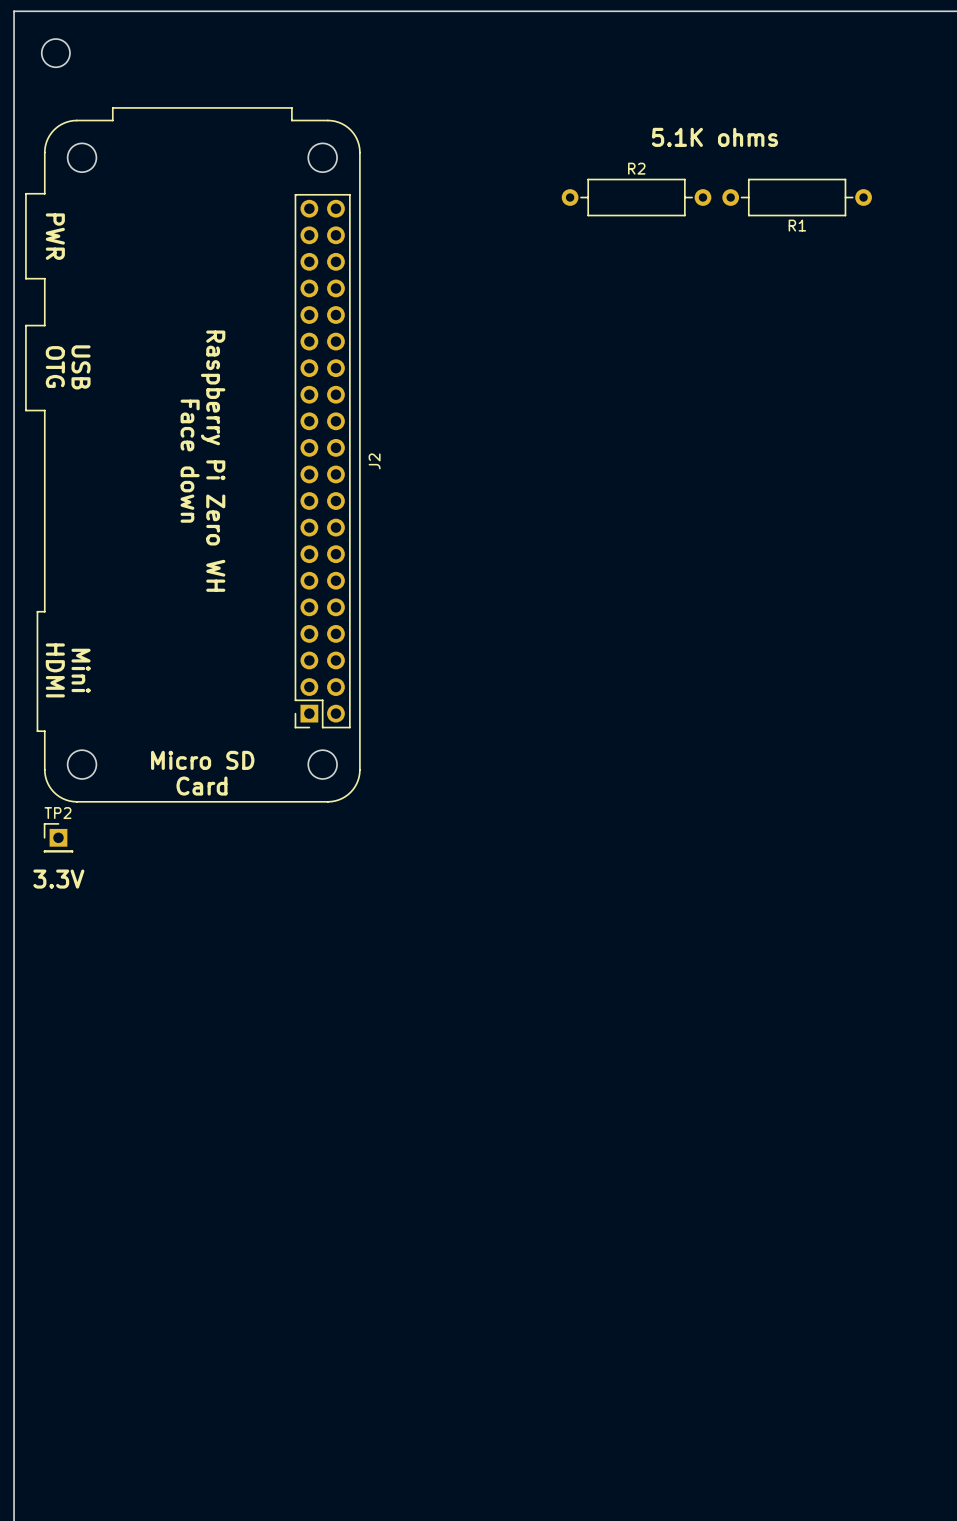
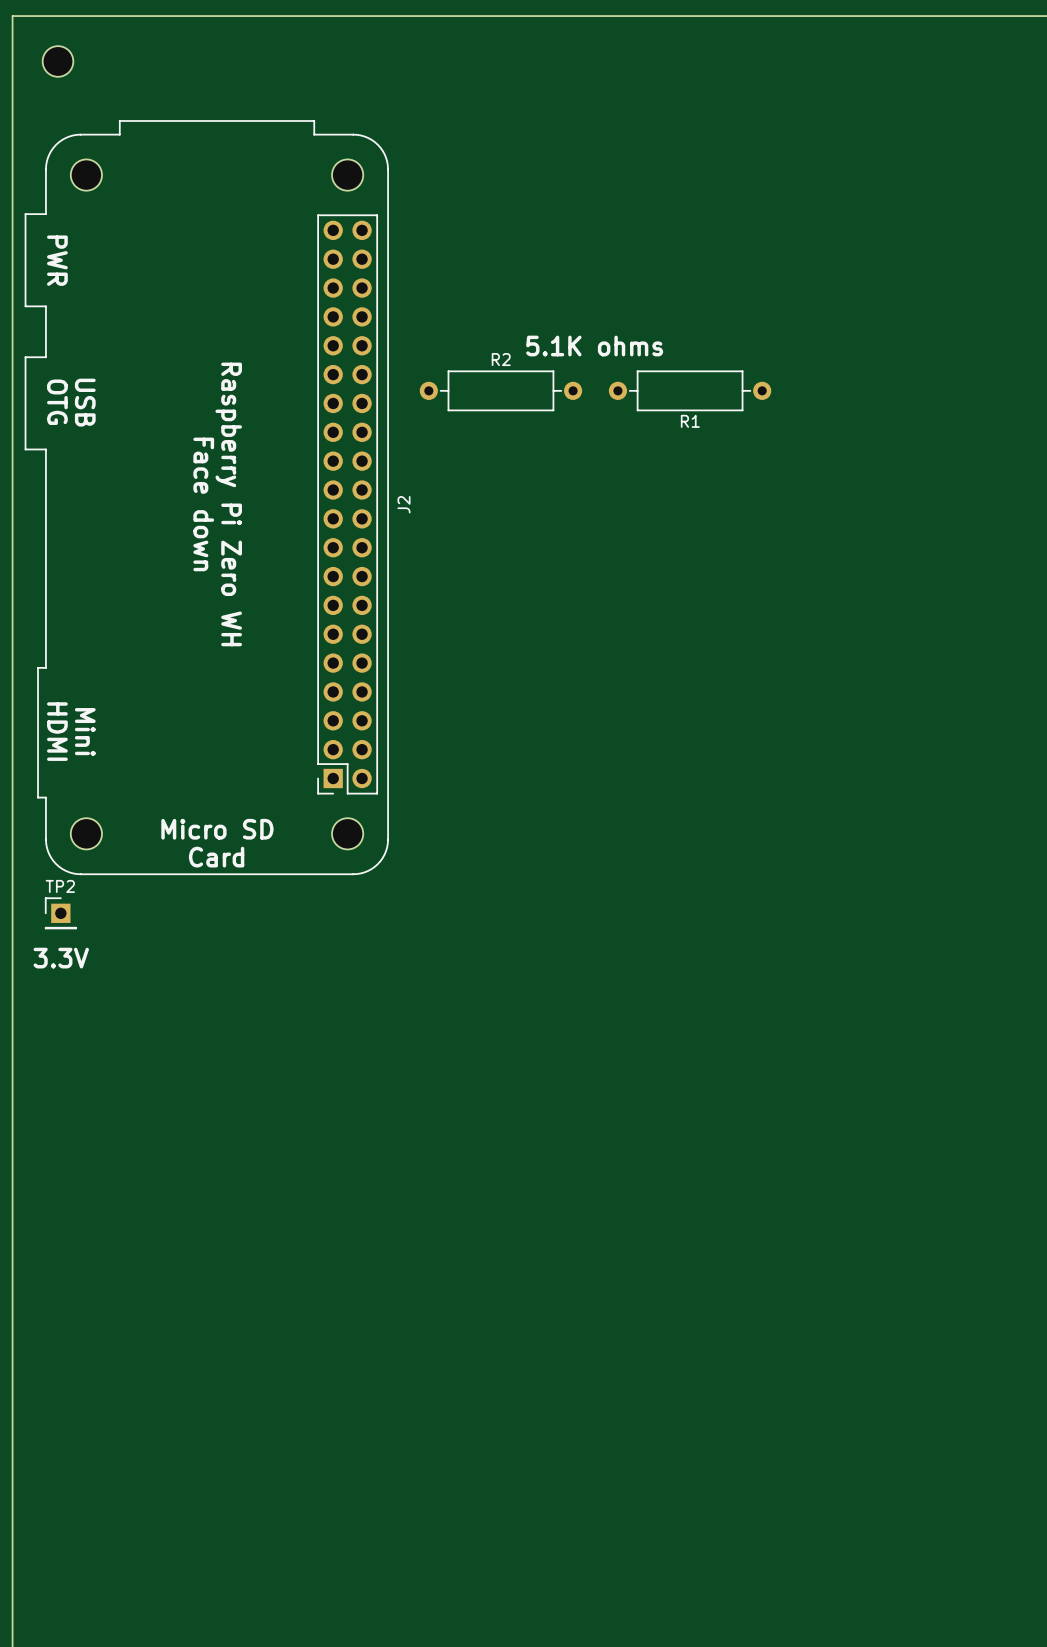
text position: 5.1K ohms (715, 137) -> 5.1K ohms (594, 346)
R2 position: (636, 197) -> (500, 390)
R1 position: (797, 197) -> (690, 390)

